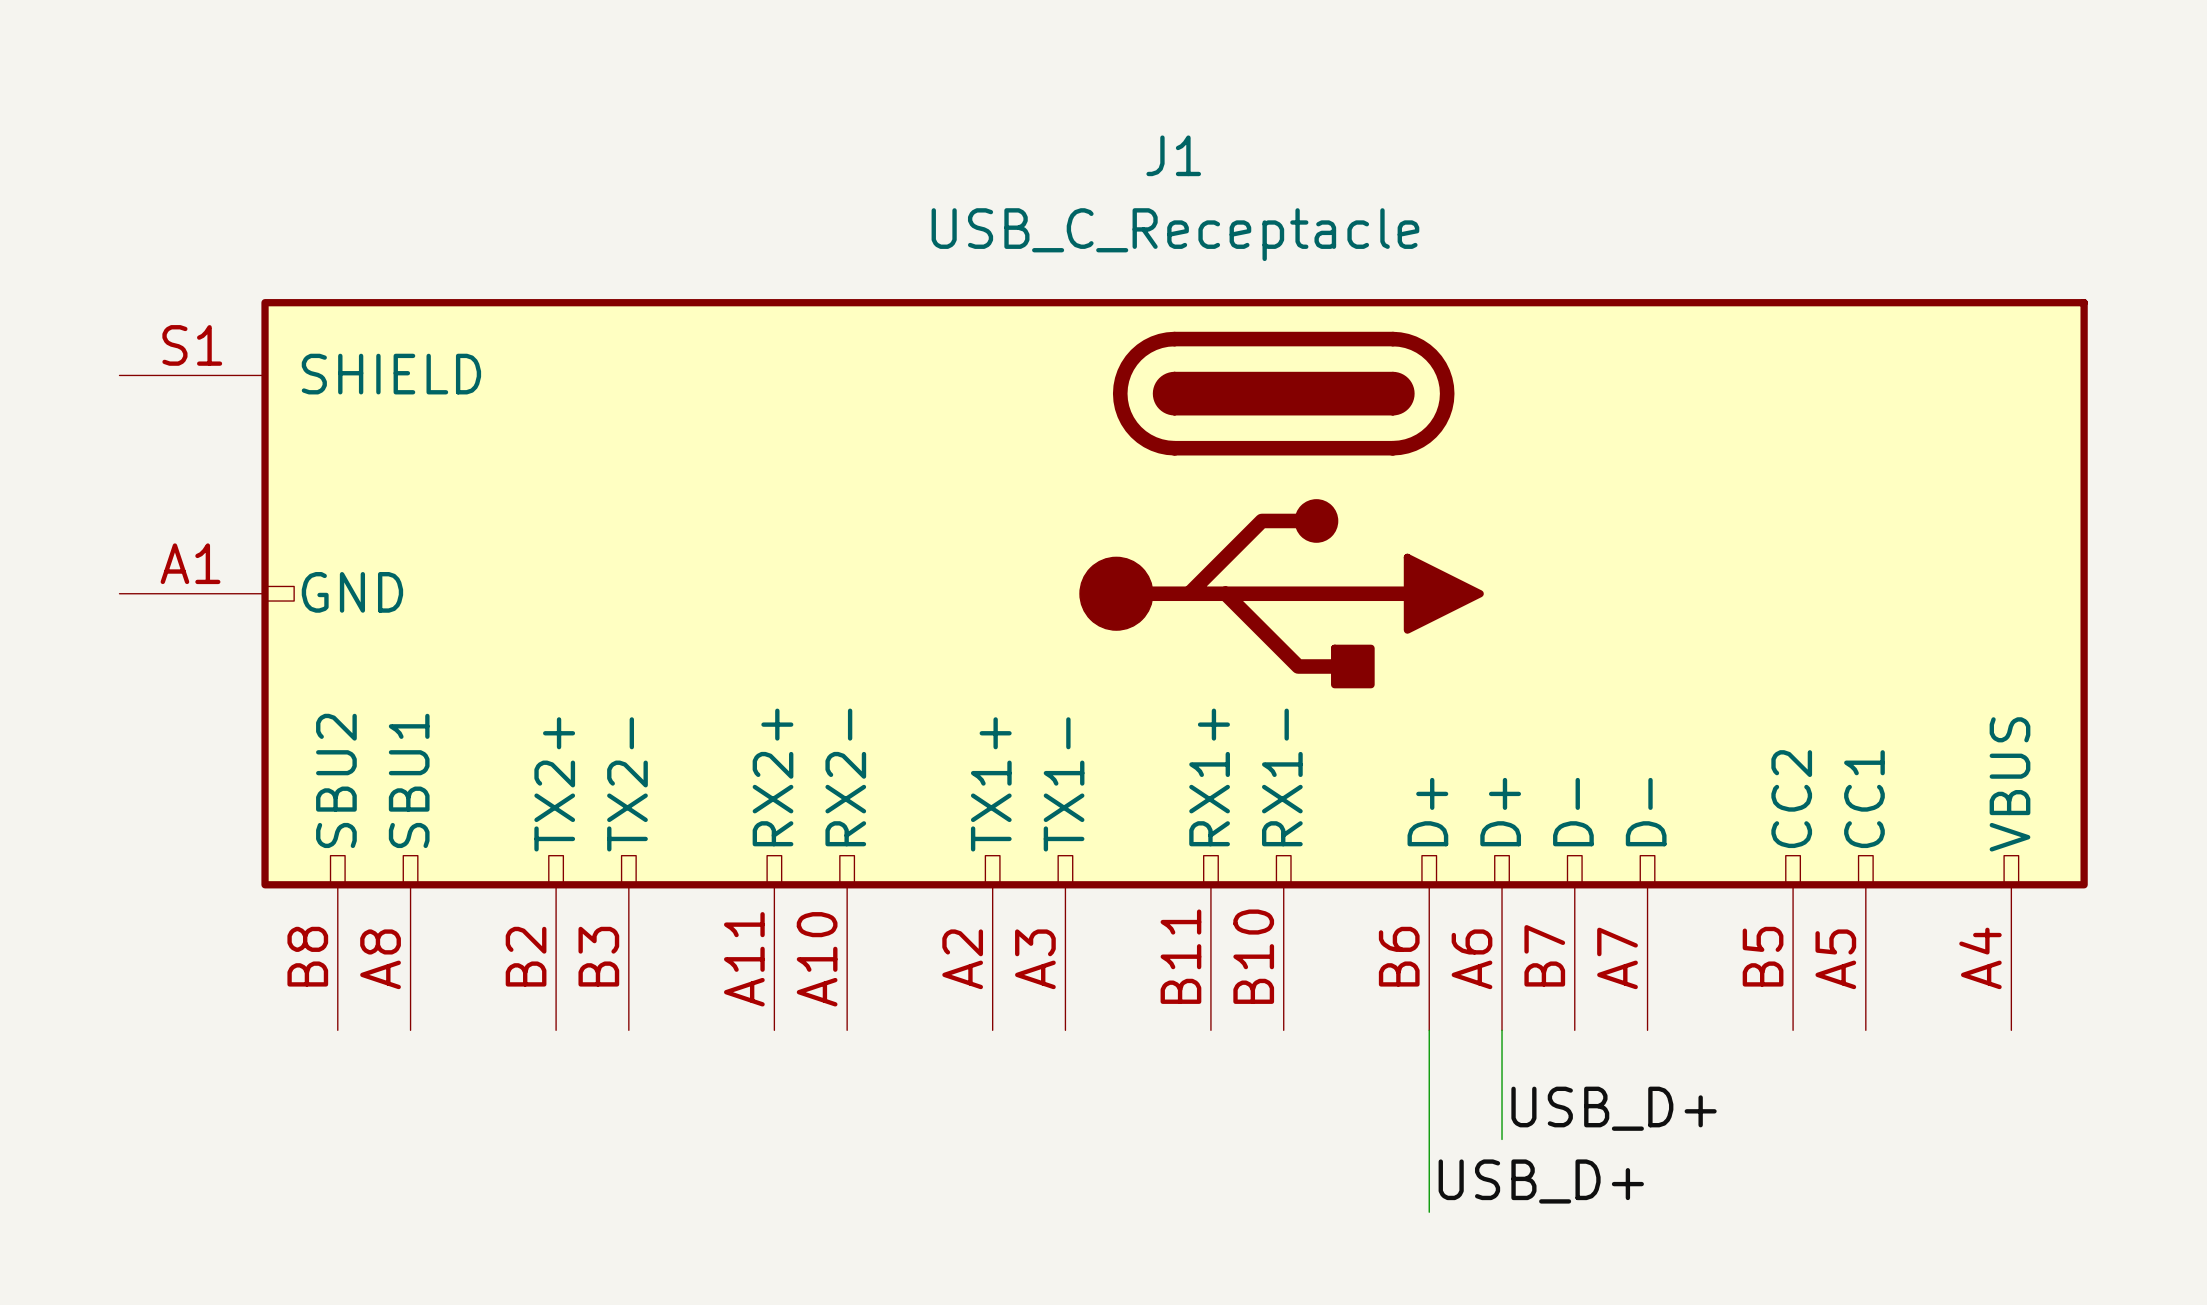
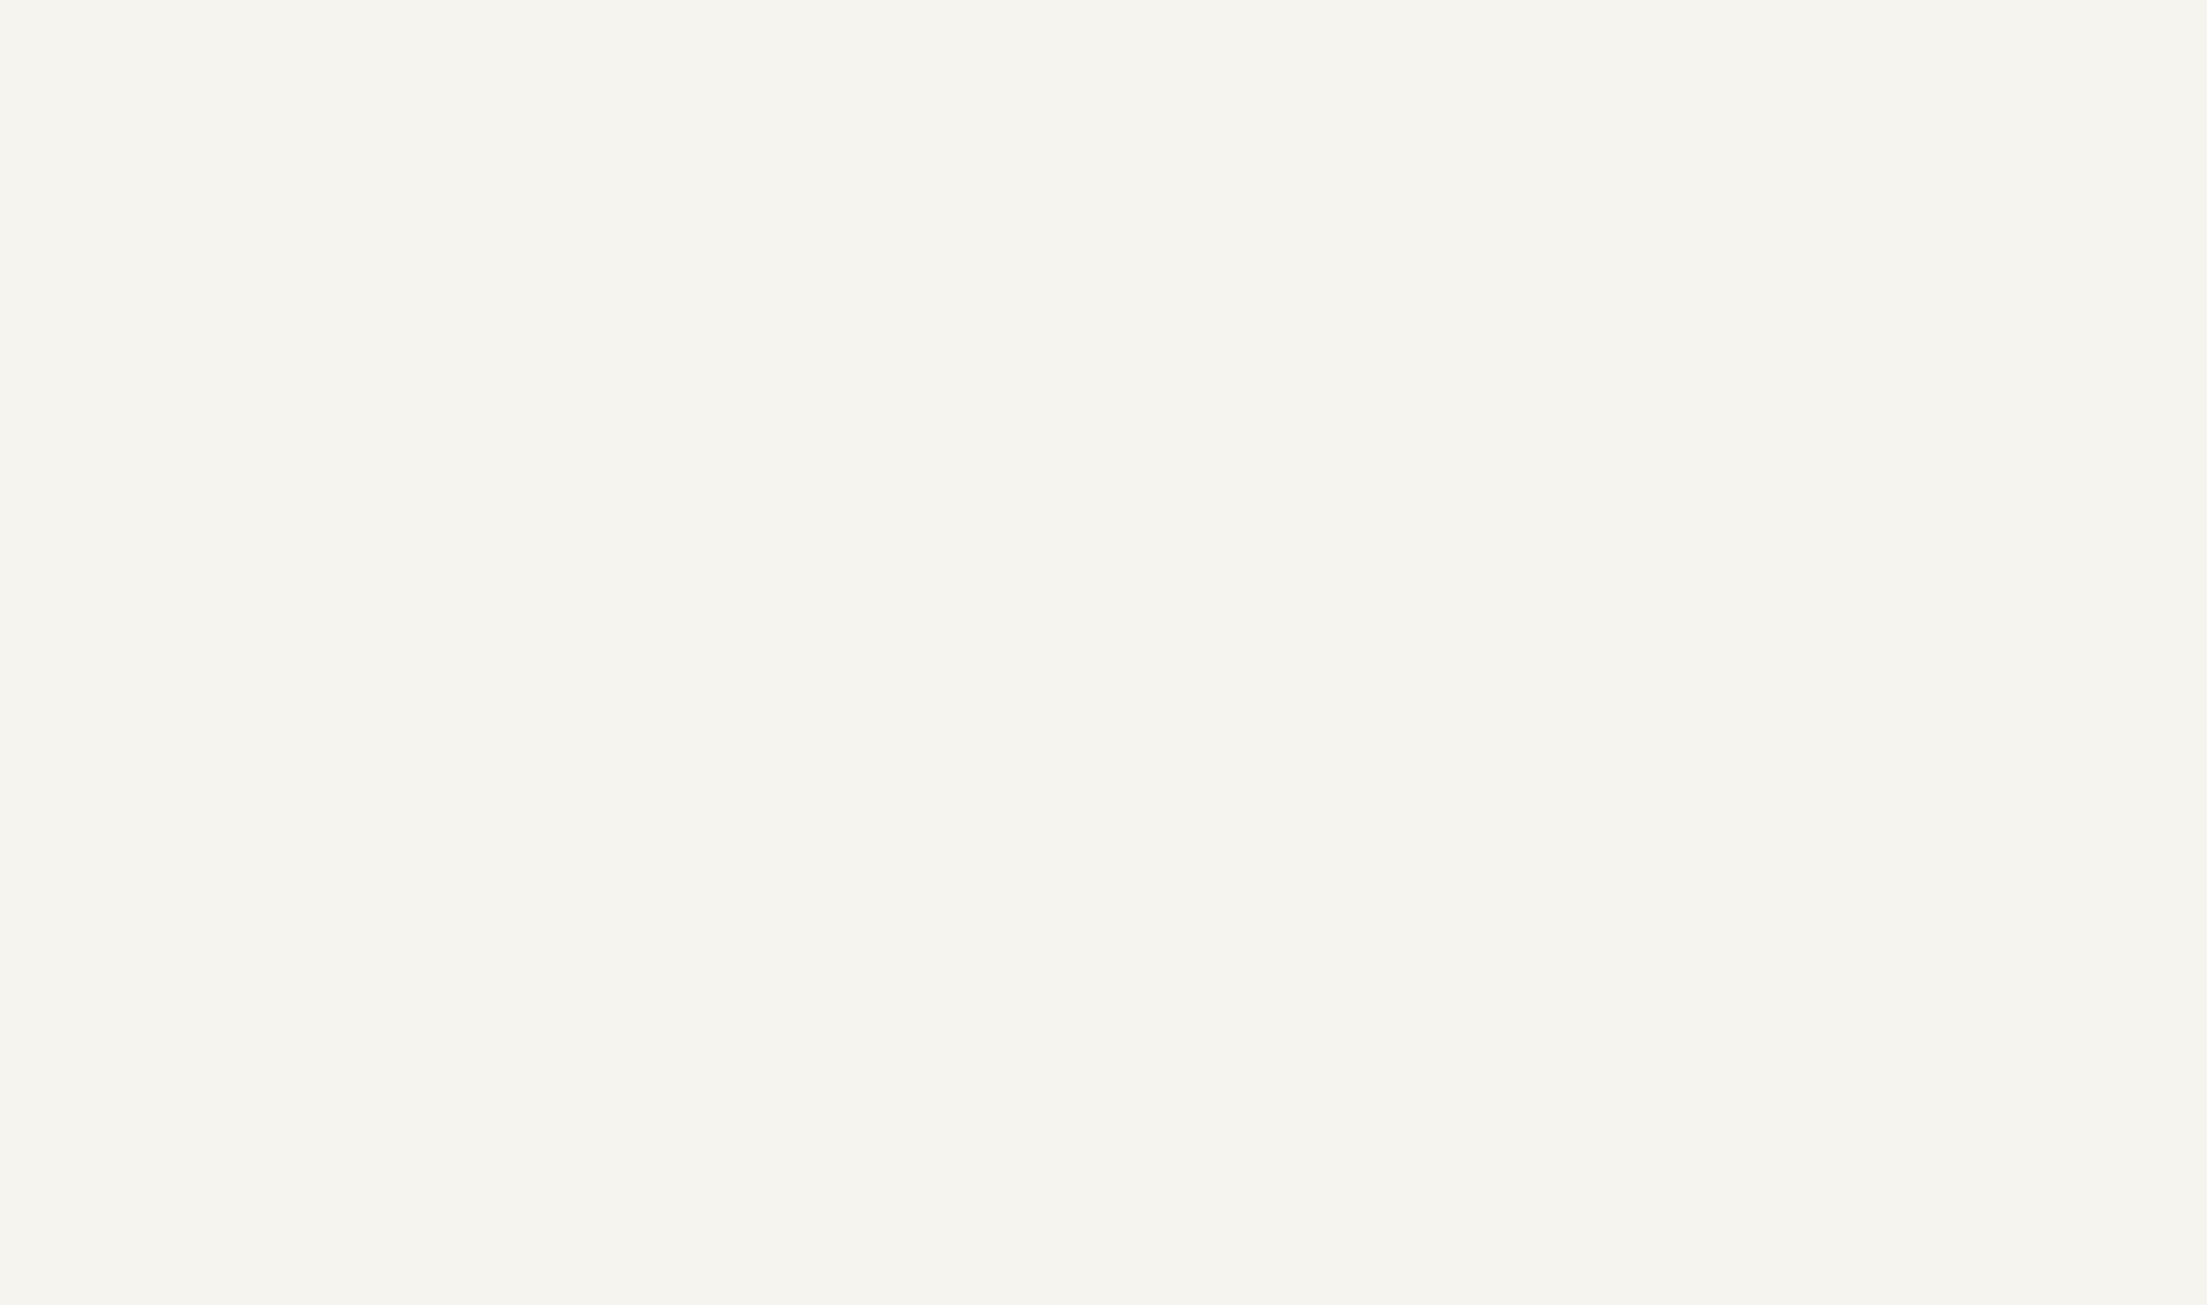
J1: USB_C_Receptacle (1103, 664) -> none
wire: (1429, 1030) (1429, 1212) -> none
wire: (1502, 1030) (1502, 1139) -> none
label: USB_D+ (1614, 1108) -> none
label: USB_D+ (1541, 1181) -> none

